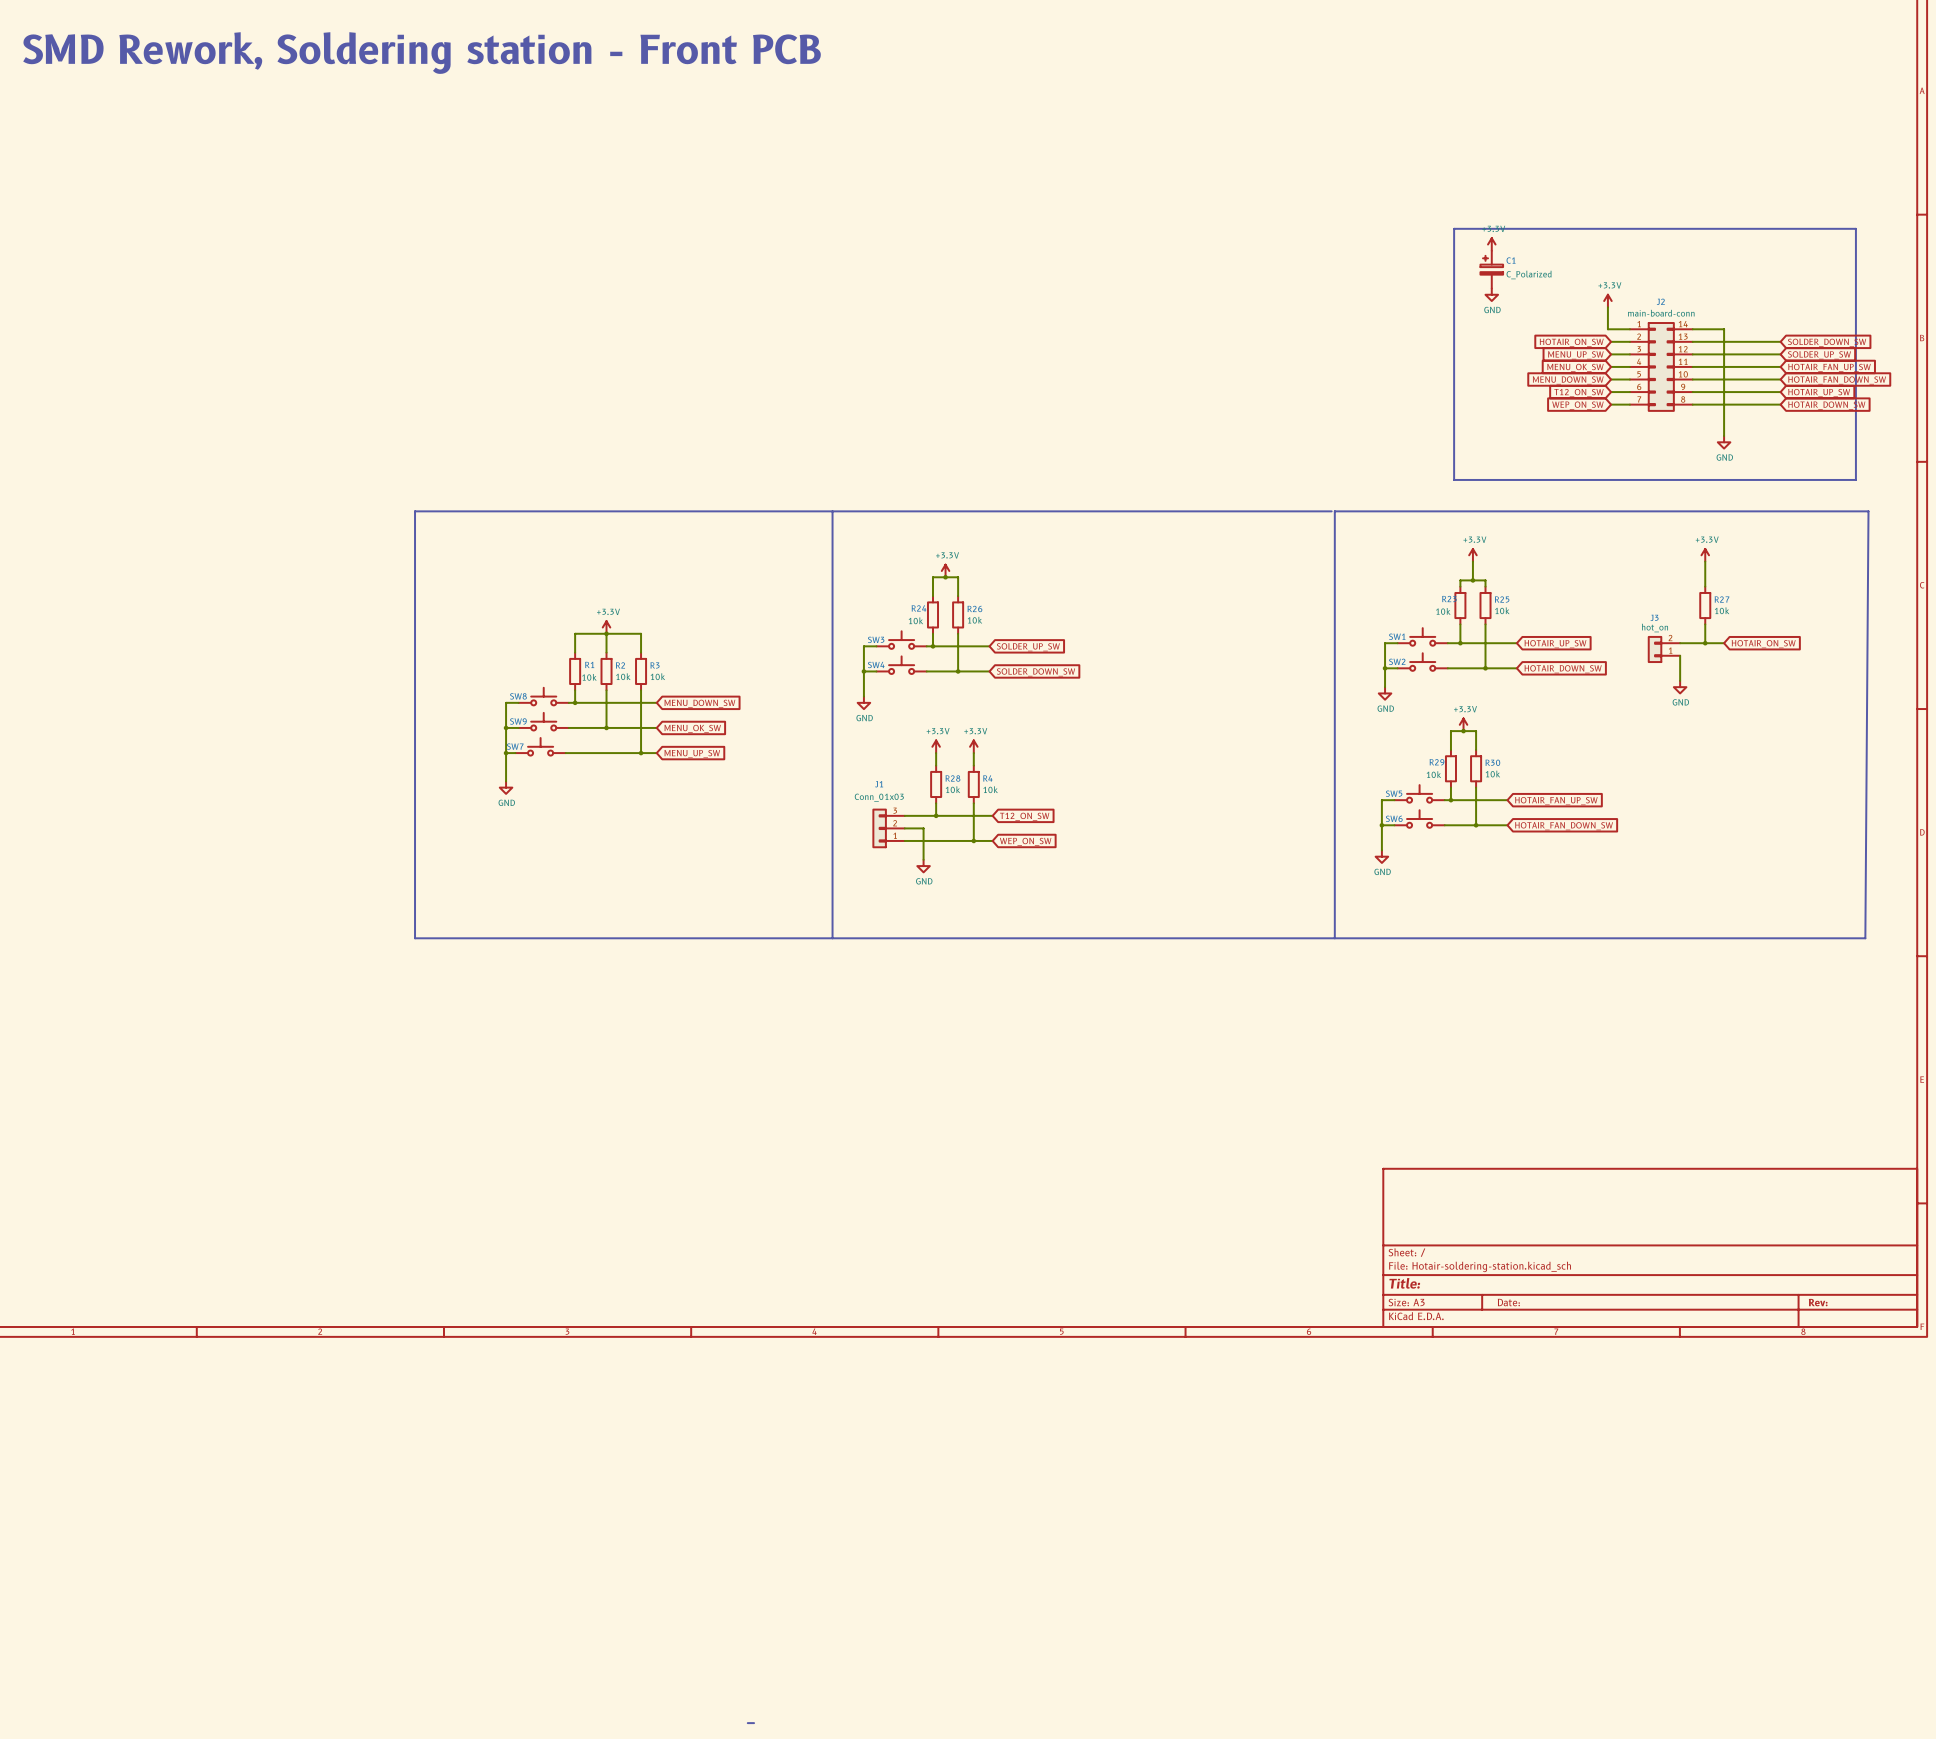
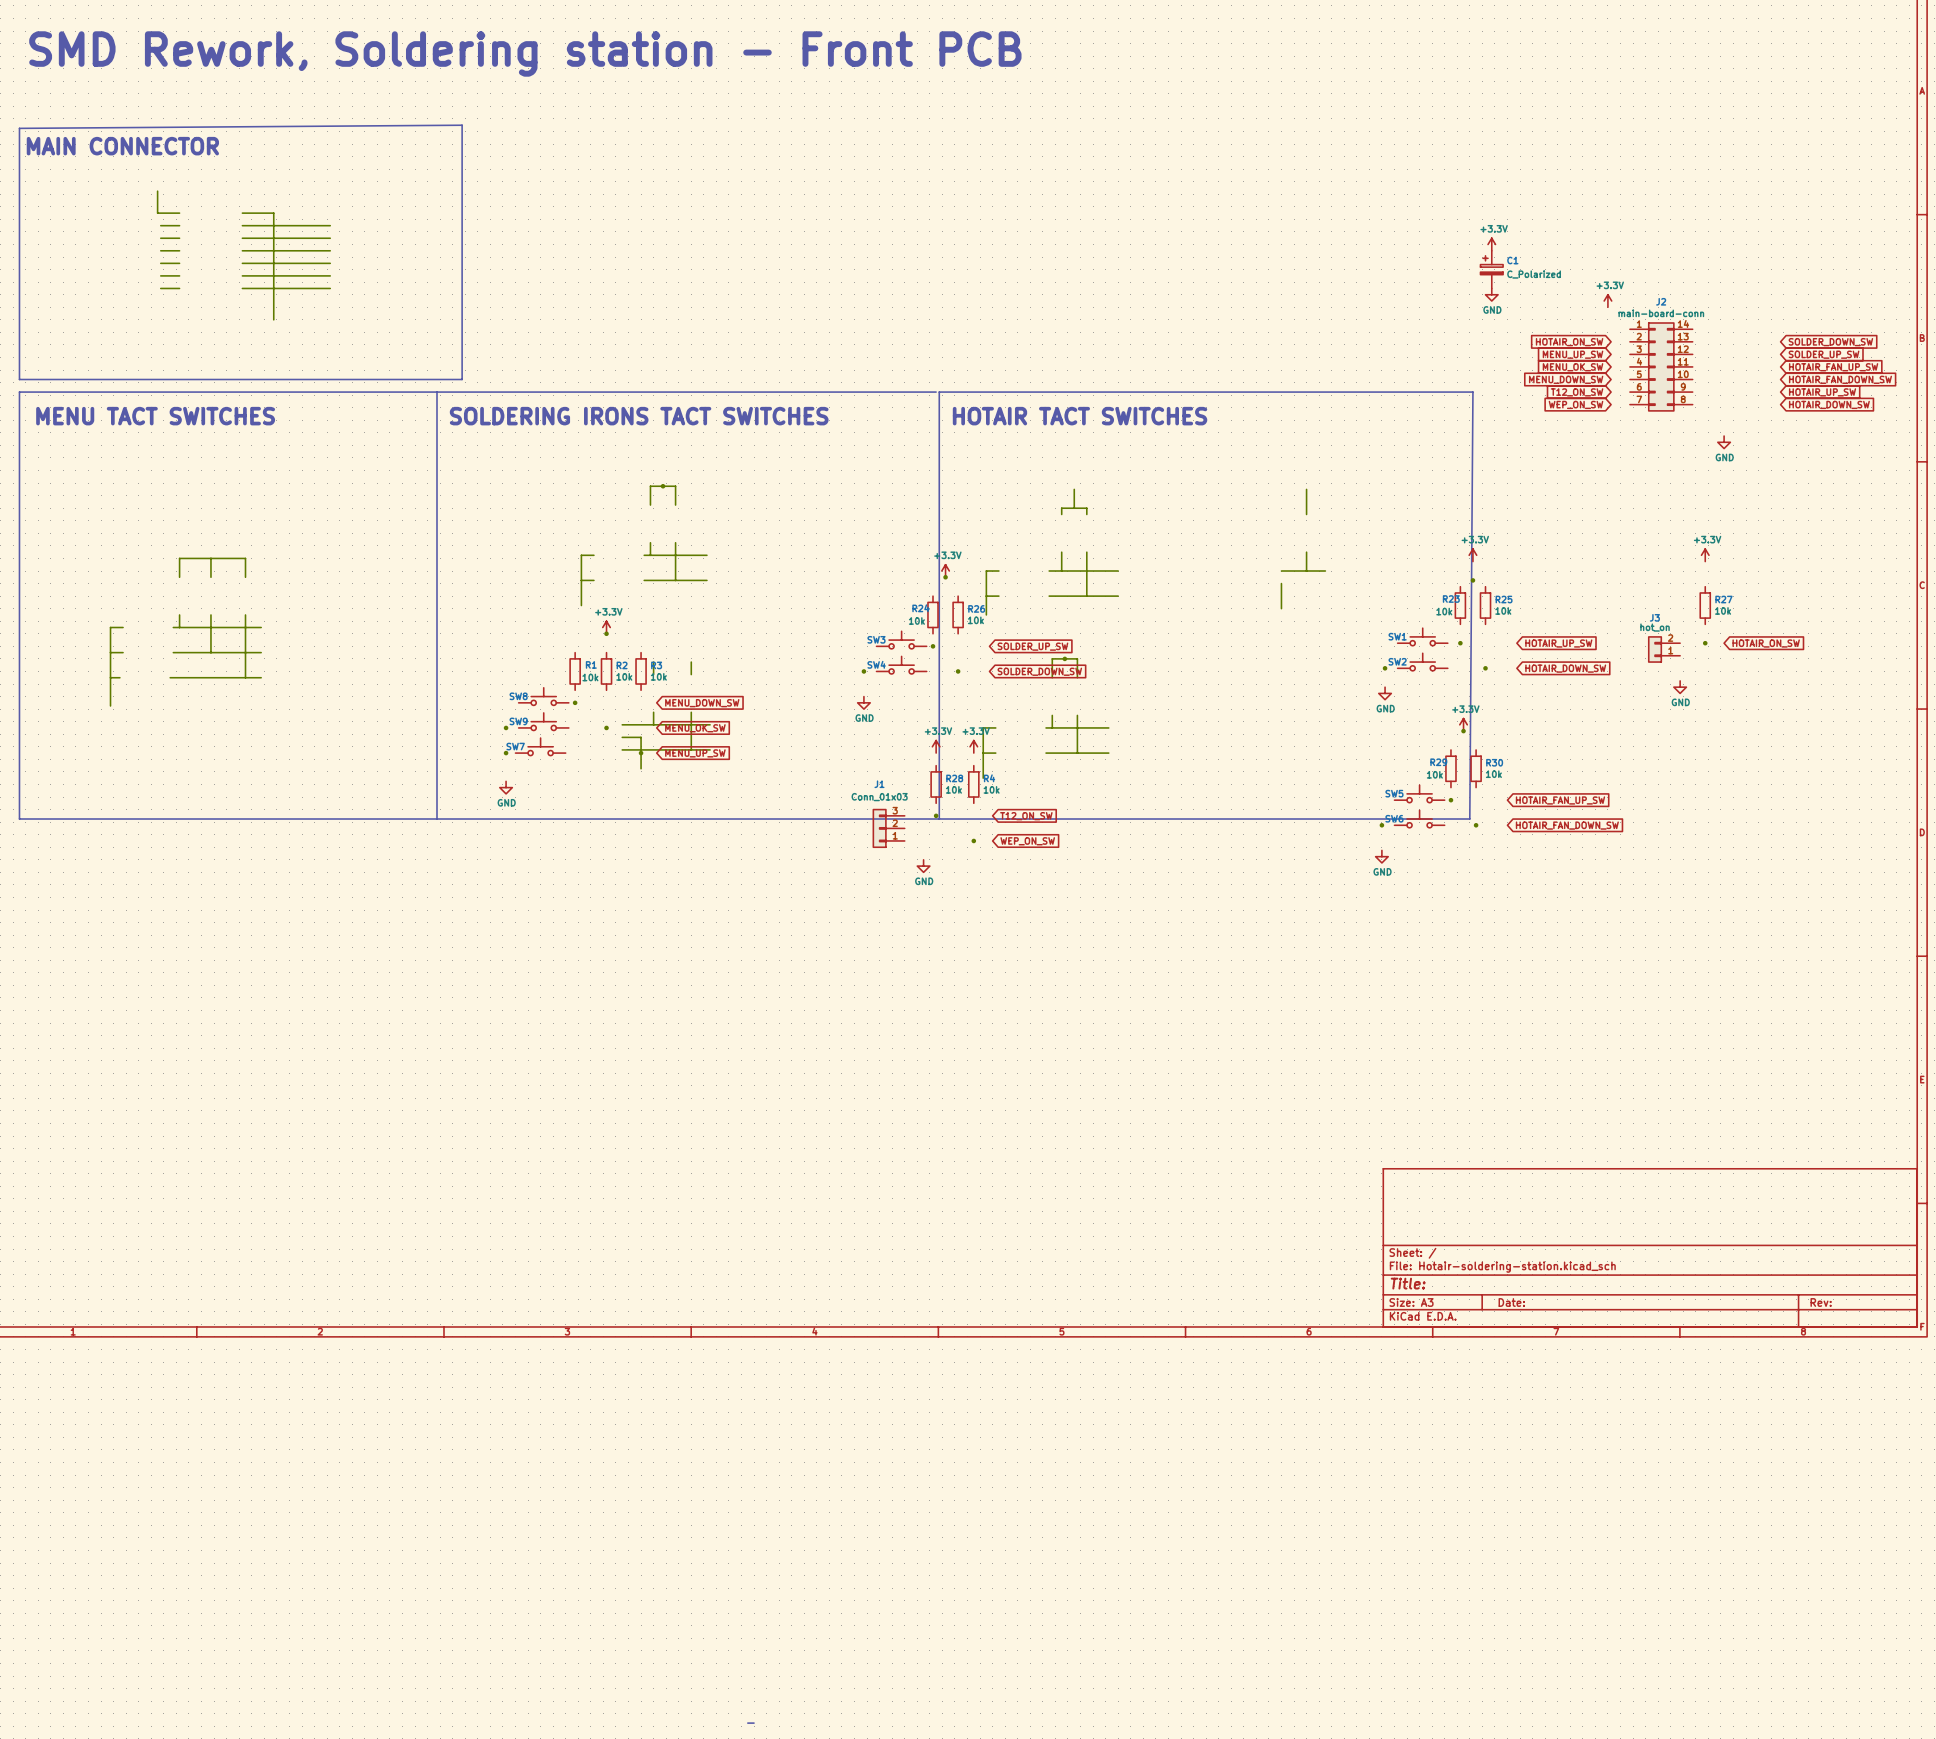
line: none -> (462, 125) (19, 128) (19, 379) (462, 379) (462, 125)
text: none -> MAIN CONNECTOR (122, 146)
wire: none -> (157, 191) (157, 213) (179, 213)
wire: none -> (242, 213) (273, 213) (273, 319)
wire: none -> (160, 225) (179, 225)
wire: none -> (242, 225) (330, 225)
line: (1454, 228) (1855, 228) (1855, 479) (1454, 479) (1454, 228) -> none
wire: none -> (160, 238) (179, 238)
wire: none -> (242, 238) (330, 238)
wire: none -> (160, 250) (179, 250)
wire: none -> (242, 250) (330, 250)
wire: none -> (160, 263) (179, 263)
wire: none -> (242, 263) (330, 263)
wire: none -> (160, 275) (179, 275)
wire: none -> (242, 275) (330, 275)
wire: none -> (160, 288) (179, 288)
wire: none -> (242, 288) (330, 288)
wire: (1607, 307) (1607, 329) (1629, 329) -> none
wire: (1692, 329) (1724, 329) (1724, 436) -> none
wire: (1611, 341) (1629, 341) -> none
wire: (1692, 341) (1780, 341) -> none
wire: (1611, 354) (1629, 354) -> none
wire: (1692, 354) (1780, 354) -> none
wire: (1611, 366) (1629, 366) -> none
wire: (1692, 366) (1780, 366) -> none
wire: (1611, 379) (1629, 379) -> none
wire: (1692, 379) (1780, 379) -> none
line: none -> (436, 392) (436, 819)
line: none -> (936, 392) (19, 392) (19, 819) (1469, 819) (1472, 392) (939, 392) (939, 819)
wire: (1611, 392) (1629, 392) -> none
wire: (1692, 392) (1780, 392) -> none
wire: (1611, 404) (1629, 404) -> none
wire: (1692, 404) (1780, 404) -> none
text: none -> MENU TACT SWITCHES (155, 416)
text: none -> SOLDERING IRONS TACT SWITCHES (639, 416)
text: none -> HOTAIR TACT SWITCHES (1080, 416)
junction: none -> (663, 486)
wire: none -> (1074, 489) (1074, 508)
wire: none -> (1306, 489) (1306, 514)
wire: none -> (650, 505) (650, 486) (675, 486) (675, 505)
line: (832, 511) (832, 938) -> none
line: (1331, 511) (415, 511) (415, 938) (1865, 938) (1868, 511) (1334, 511) (1334, 938) -> none
wire: none -> (1061, 514) (1061, 508) (1086, 508) (1086, 514)
wire: none -> (650, 542) (650, 555)
wire: none -> (675, 542) (675, 580)
wire: none -> (1061, 552) (1061, 571)
wire: none -> (1086, 552) (1086, 596)
wire: none -> (1306, 552) (1306, 571)
wire: none -> (593, 555) (581, 555) (581, 605)
wire: none -> (644, 555) (706, 555)
wire: none -> (210, 558) (210, 577)
wire: (1705, 561) (1705, 586) -> none
wire: none -> (998, 571) (986, 571) (986, 614)
wire: none -> (1049, 571) (1118, 571)
wire: none -> (1281, 571) (1325, 571)
wire: none -> (179, 577) (179, 558) (245, 558) (245, 577)
wire: none -> (581, 580) (593, 580)
wire: none -> (644, 580) (706, 580)
wire: none -> (1281, 583) (1281, 608)
wire: (1460, 586) (1460, 580) (1485, 580) (1485, 586) -> none
wire: (933, 596) (933, 577) (958, 577) (958, 596) -> none
wire: none -> (986, 596) (998, 596)
wire: none -> (1049, 596) (1118, 596)
wire: none -> (179, 614) (179, 627)
wire: none -> (210, 614) (210, 652)
wire: none -> (245, 614) (245, 677)
wire: (1460, 624) (1460, 643) -> none
wire: (1485, 624) (1485, 668) -> none
wire: (1705, 624) (1705, 643) -> none
wire: none -> (123, 627) (110, 627) (110, 705)
wire: none -> (173, 627) (261, 627)
wire: (606, 633) (606, 652) -> none
wire: (933, 633) (933, 646) -> none
wire: (958, 633) (958, 671) -> none
wire: (1397, 643) (1385, 643) (1385, 687) -> none
wire: (1447, 643) (1516, 643) -> none
wire: (1680, 643) (1724, 643) -> none
wire: (876, 646) (863, 646) (863, 696) -> none
wire: (926, 646) (989, 646) -> none
wire: none -> (110, 652) (123, 652)
wire: none -> (173, 652) (261, 652)
wire: (575, 652) (575, 633) (641, 633) (641, 652) -> none
wire: (1680, 655) (1680, 680) -> none
junction: none -> (1064, 658)
wire: none -> (653, 662) (653, 674)
wire: none -> (691, 662) (691, 674)
wire: (1385, 668) (1397, 668) -> none
wire: (1447, 668) (1516, 668) -> none
wire: (863, 671) (876, 671) -> none
wire: (926, 671) (989, 671) -> none
wire: none -> (110, 677) (119, 677)
wire: none -> (170, 677) (261, 677)
wire: none -> (1052, 677) (1052, 658) (1077, 658) (1077, 677)
wire: (575, 690) (575, 702) -> (653, 712) (653, 724)
wire: (606, 690) (606, 727) -> (691, 712) (691, 749)
wire: (641, 690) (641, 737) -> (622, 737) (641, 737)
wire: (518, 702) (506, 702) (506, 781) -> none
wire: (568, 702) (656, 702) -> (622, 724) (710, 724)
wire: none -> (1077, 715) (1077, 753)
wire: (506, 727) (518, 727) -> none
wire: (568, 727) (656, 727) -> (622, 749) (710, 749)
wire: none -> (995, 727) (983, 727) (983, 778)
wire: none -> (1046, 727) (1108, 727)
wire: (1450, 749) (1450, 731) (1476, 731) (1476, 749) -> none
wire: (506, 753) (515, 753) -> none
wire: (565, 753) (656, 753) -> none
wire: none -> (641, 753) (641, 768)
wire: (936, 753) (936, 765) -> none
wire: (973, 753) (973, 765) -> (1052, 715) (1052, 727)
wire: none -> (983, 753) (995, 753)
wire: none -> (1046, 753) (1108, 753)
wire: (1450, 787) (1450, 800) -> none
wire: (1476, 787) (1476, 825) -> none
wire: (1394, 800) (1381, 800) (1381, 850) -> none
wire: (1444, 800) (1507, 800) -> none
wire: (936, 803) (936, 815) -> none
wire: (973, 803) (973, 840) -> none
wire: (904, 815) (992, 815) -> none
wire: (1381, 825) (1394, 825) -> none
wire: (1444, 825) (1507, 825) -> none
wire: (904, 828) (923, 828) (923, 859) -> none
wire: (904, 840) (992, 840) -> none

